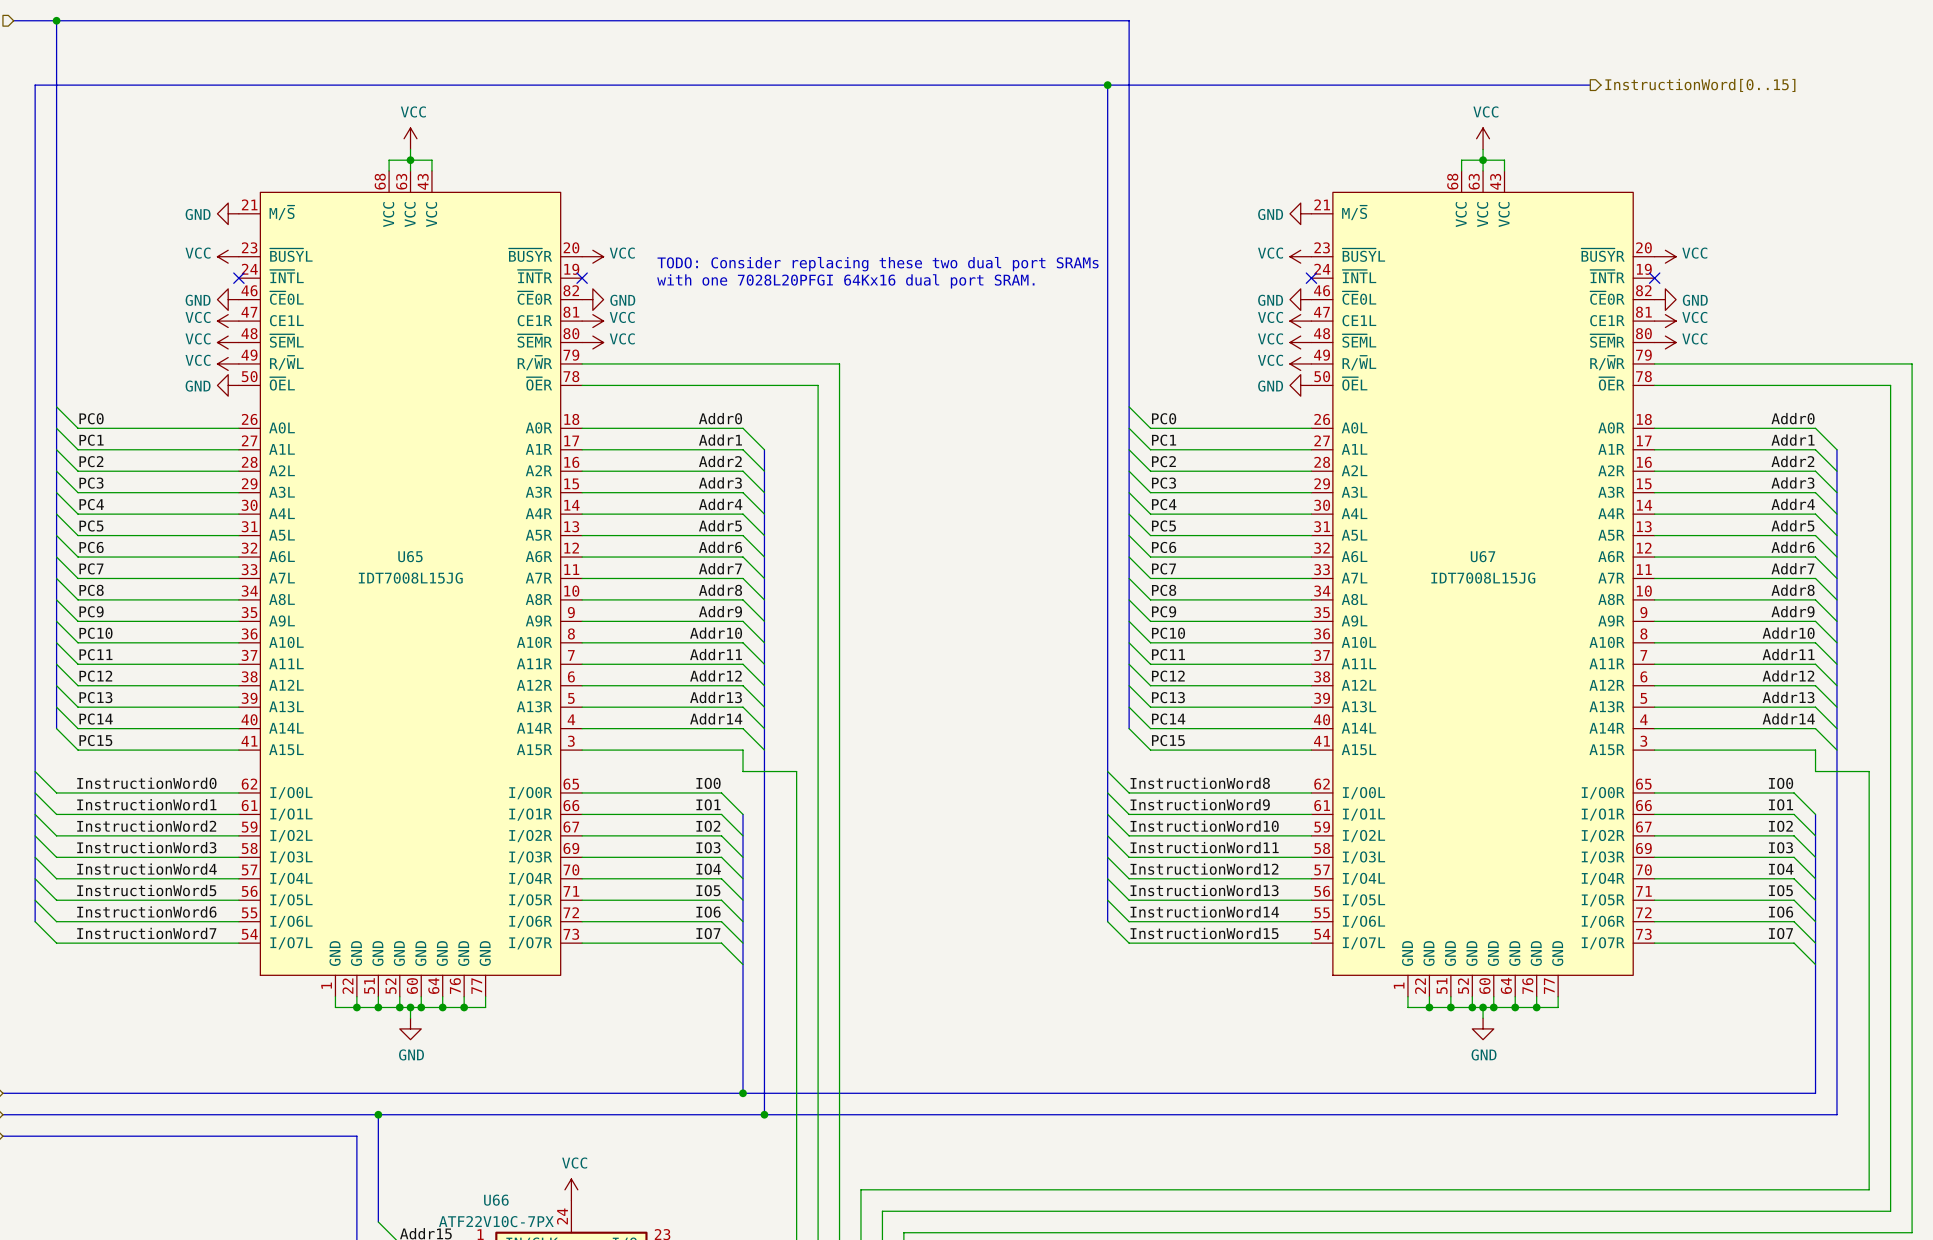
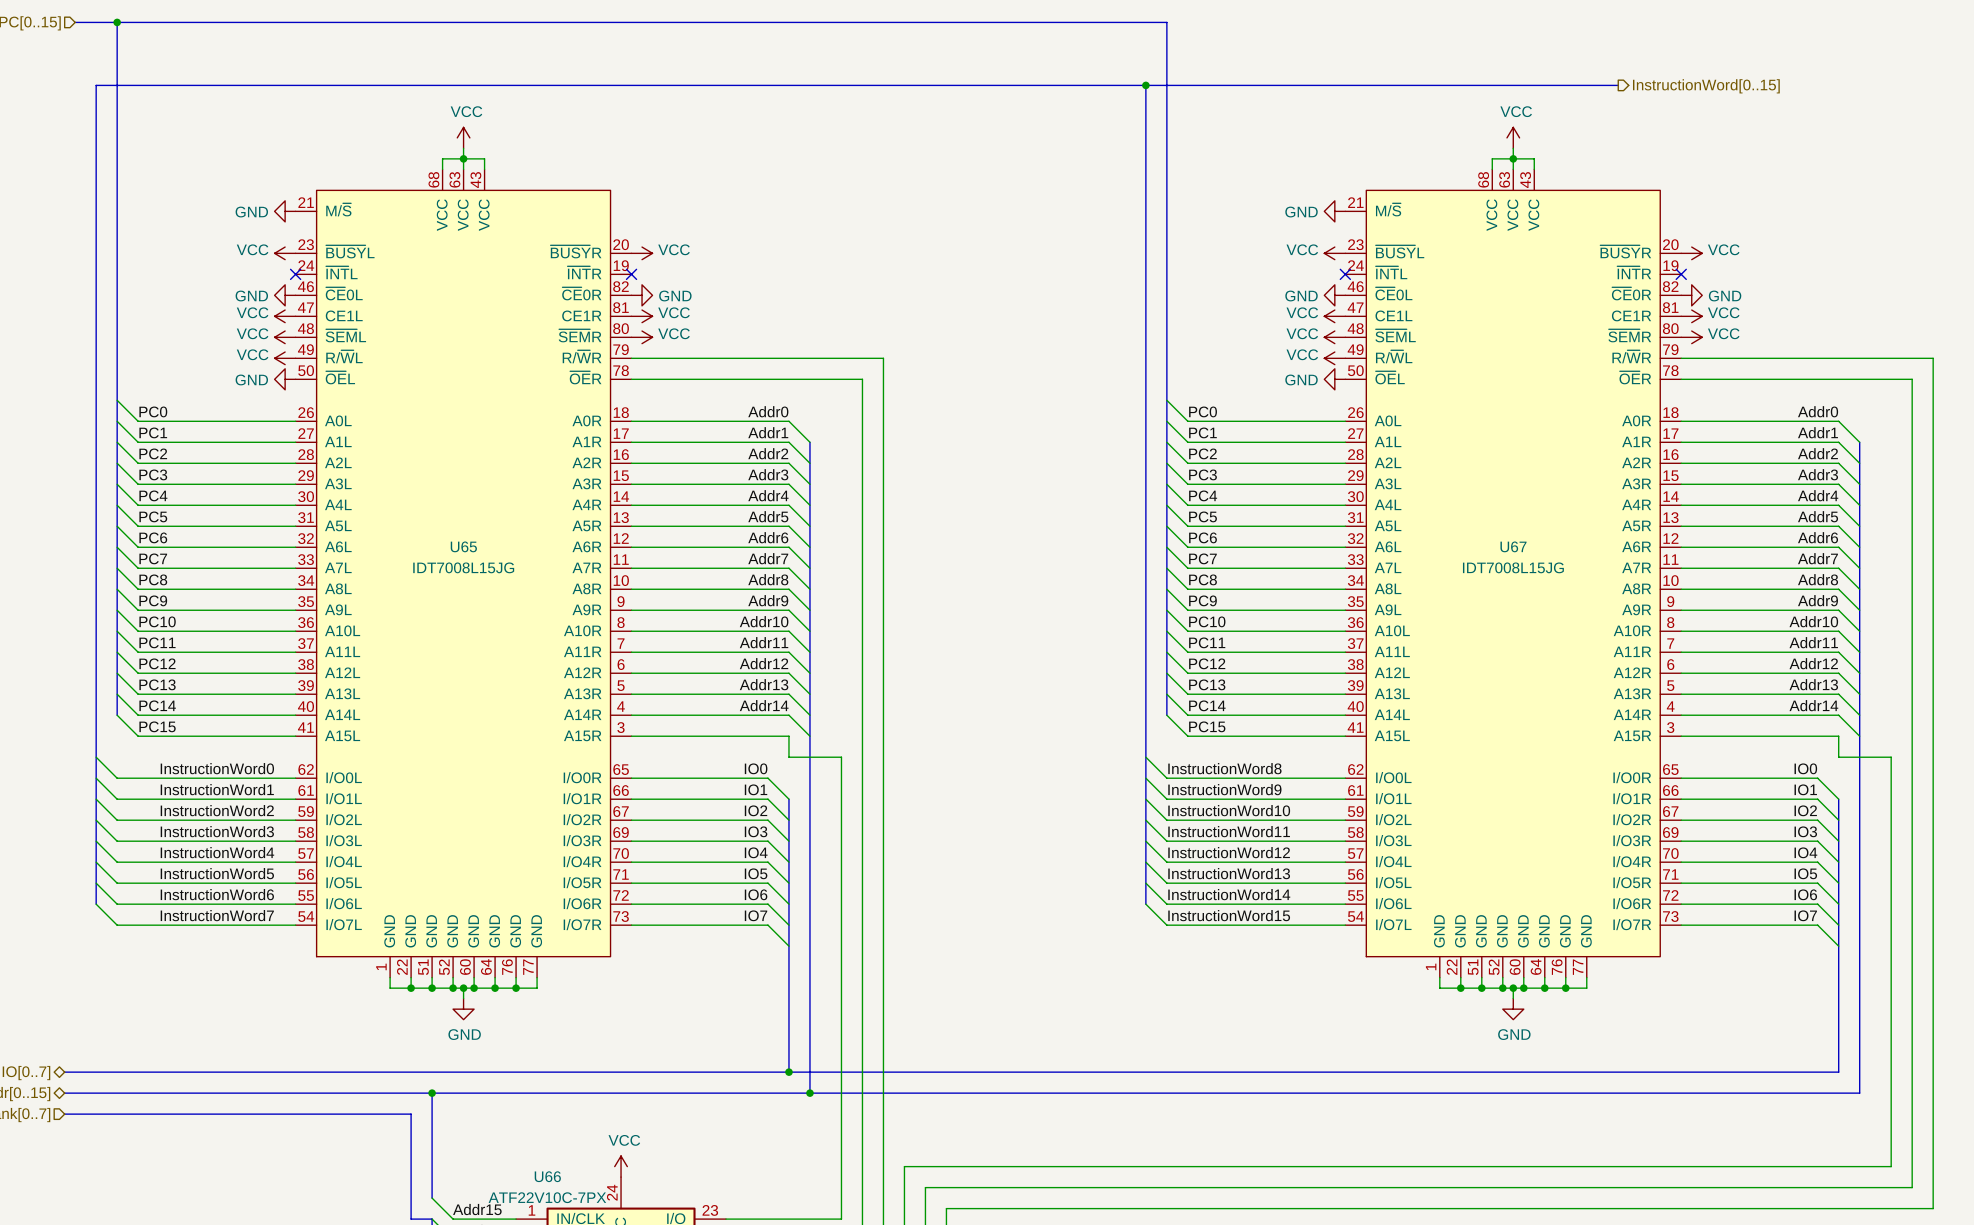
text: TODO: Consider replacing these two dual port SRAMs (878, 264) -> none
text: with one 7028L20PFGI 64Kx16 dual port SRAM. (845, 281) -> none

